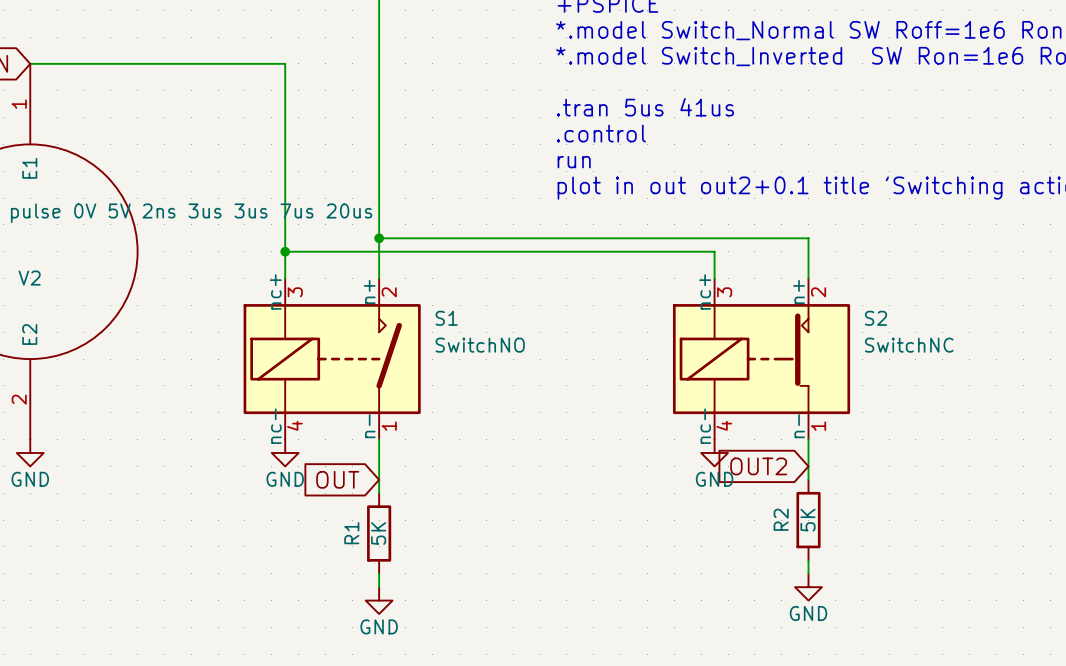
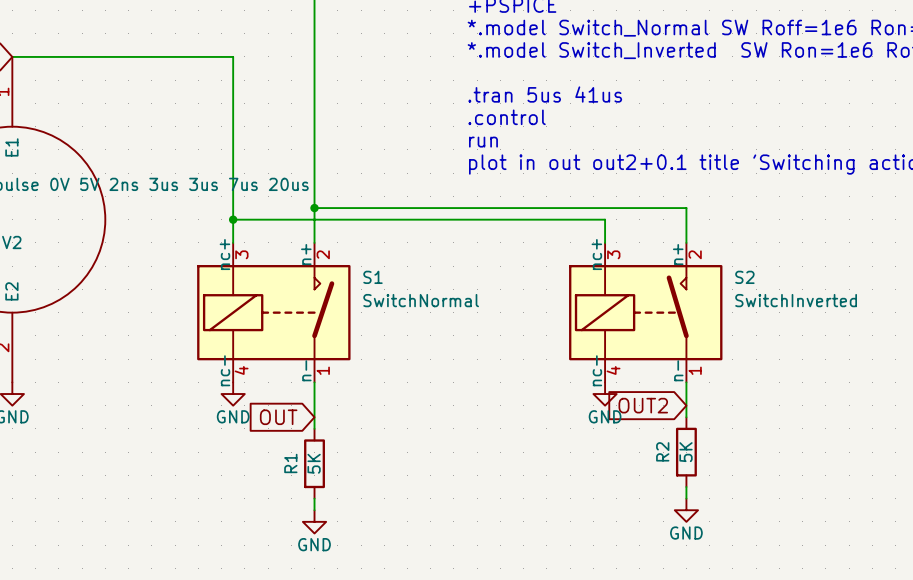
S2 symbol: [672, 278, 851, 440] -> [569, 242, 723, 383]
S1 value: SwitchNO (480, 345) -> SwitchNormal (421, 300)
S2 value: SwitchNC (909, 345) -> SwitchInverted (796, 300)

